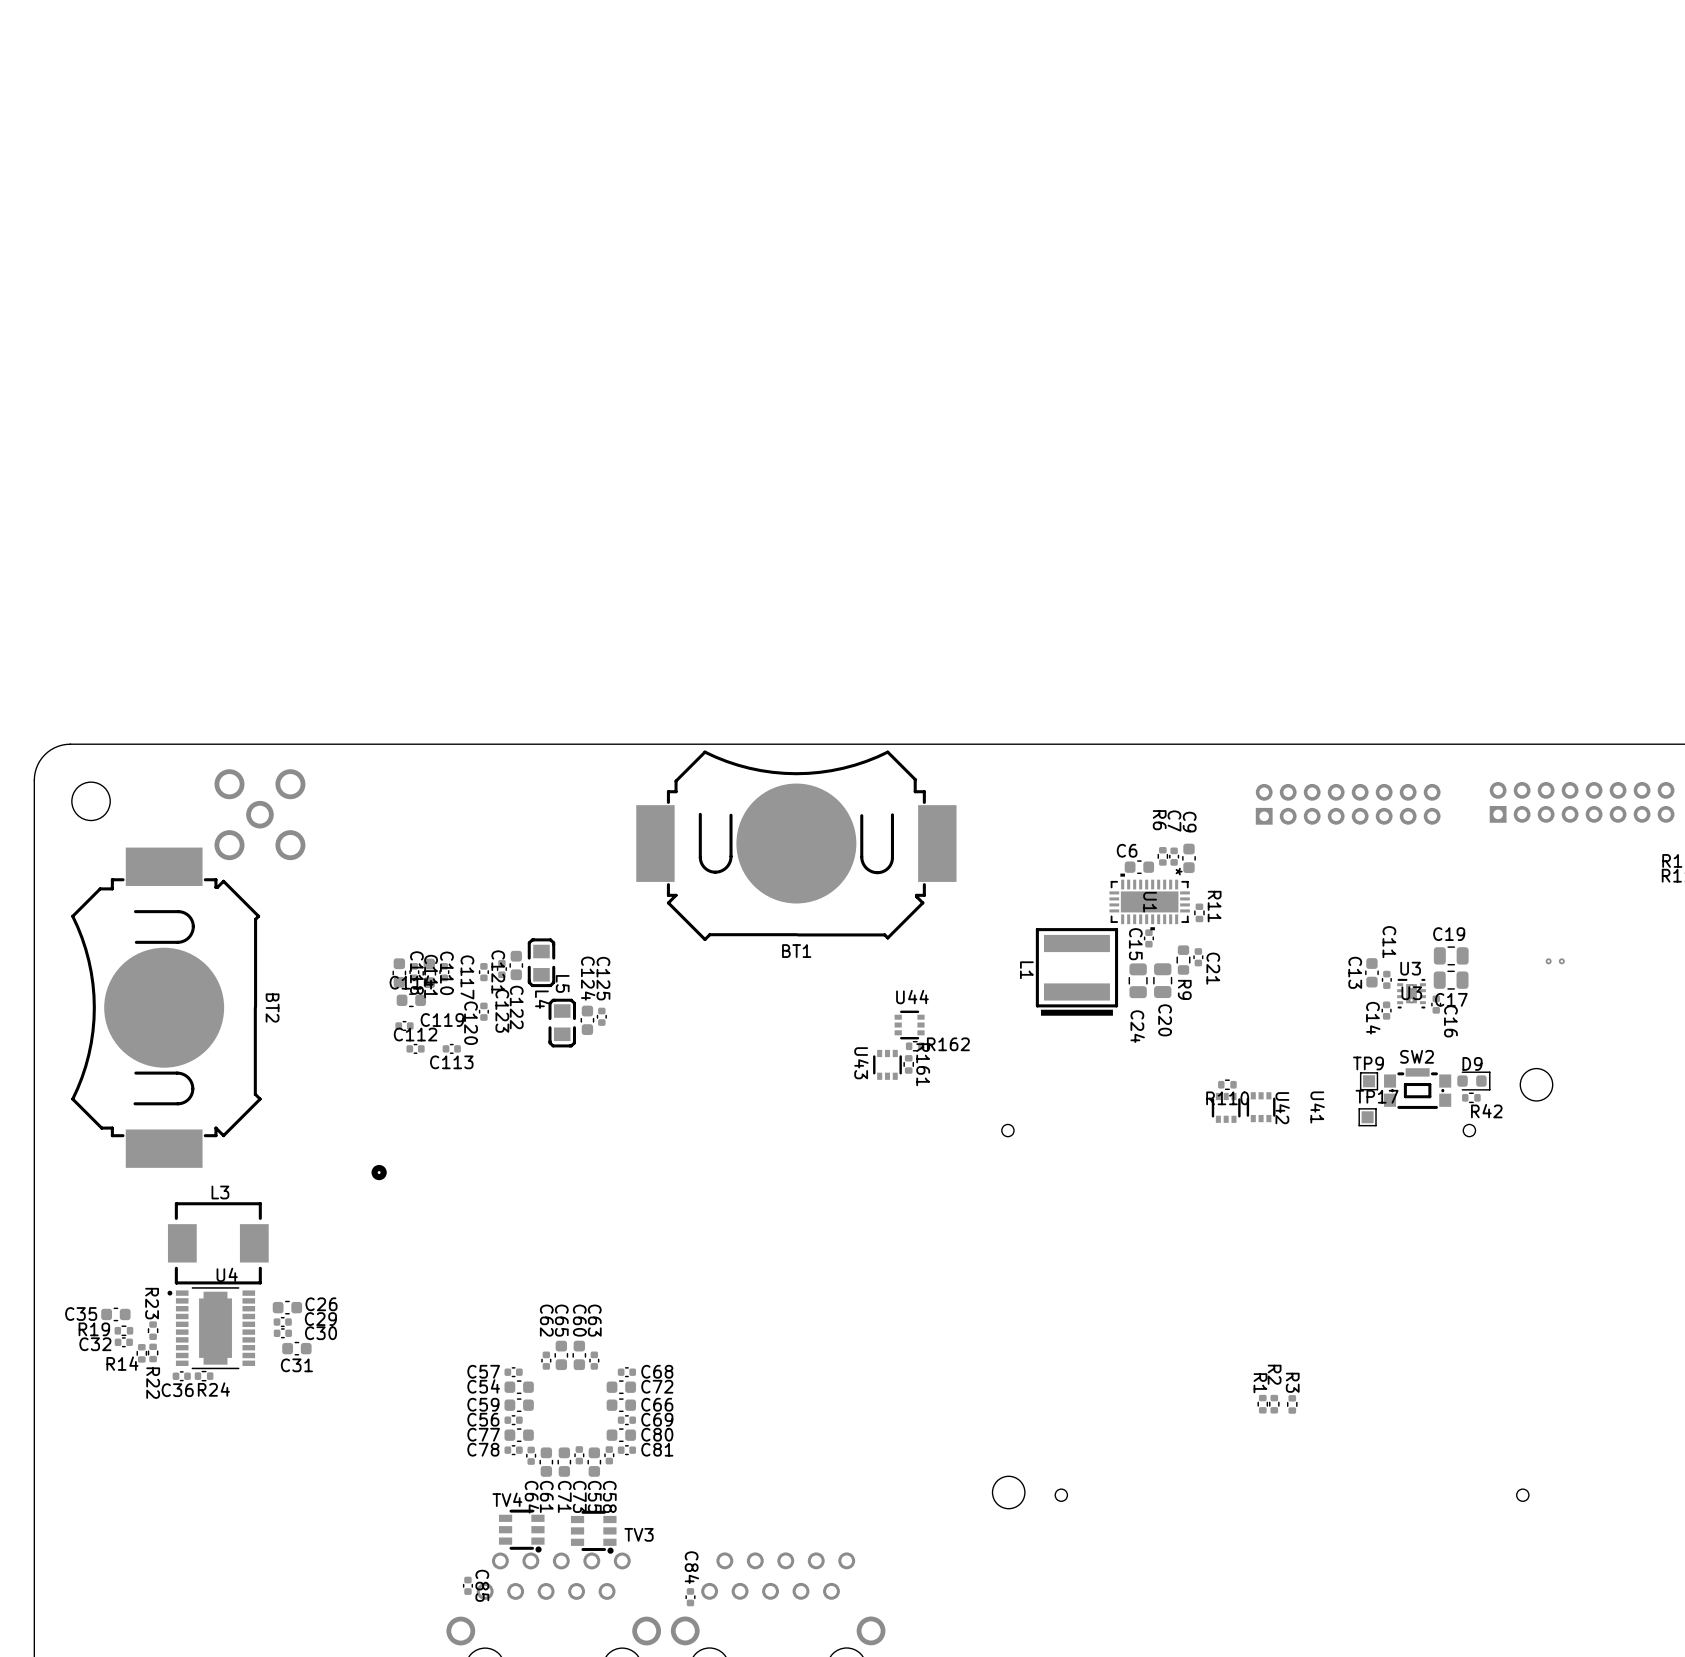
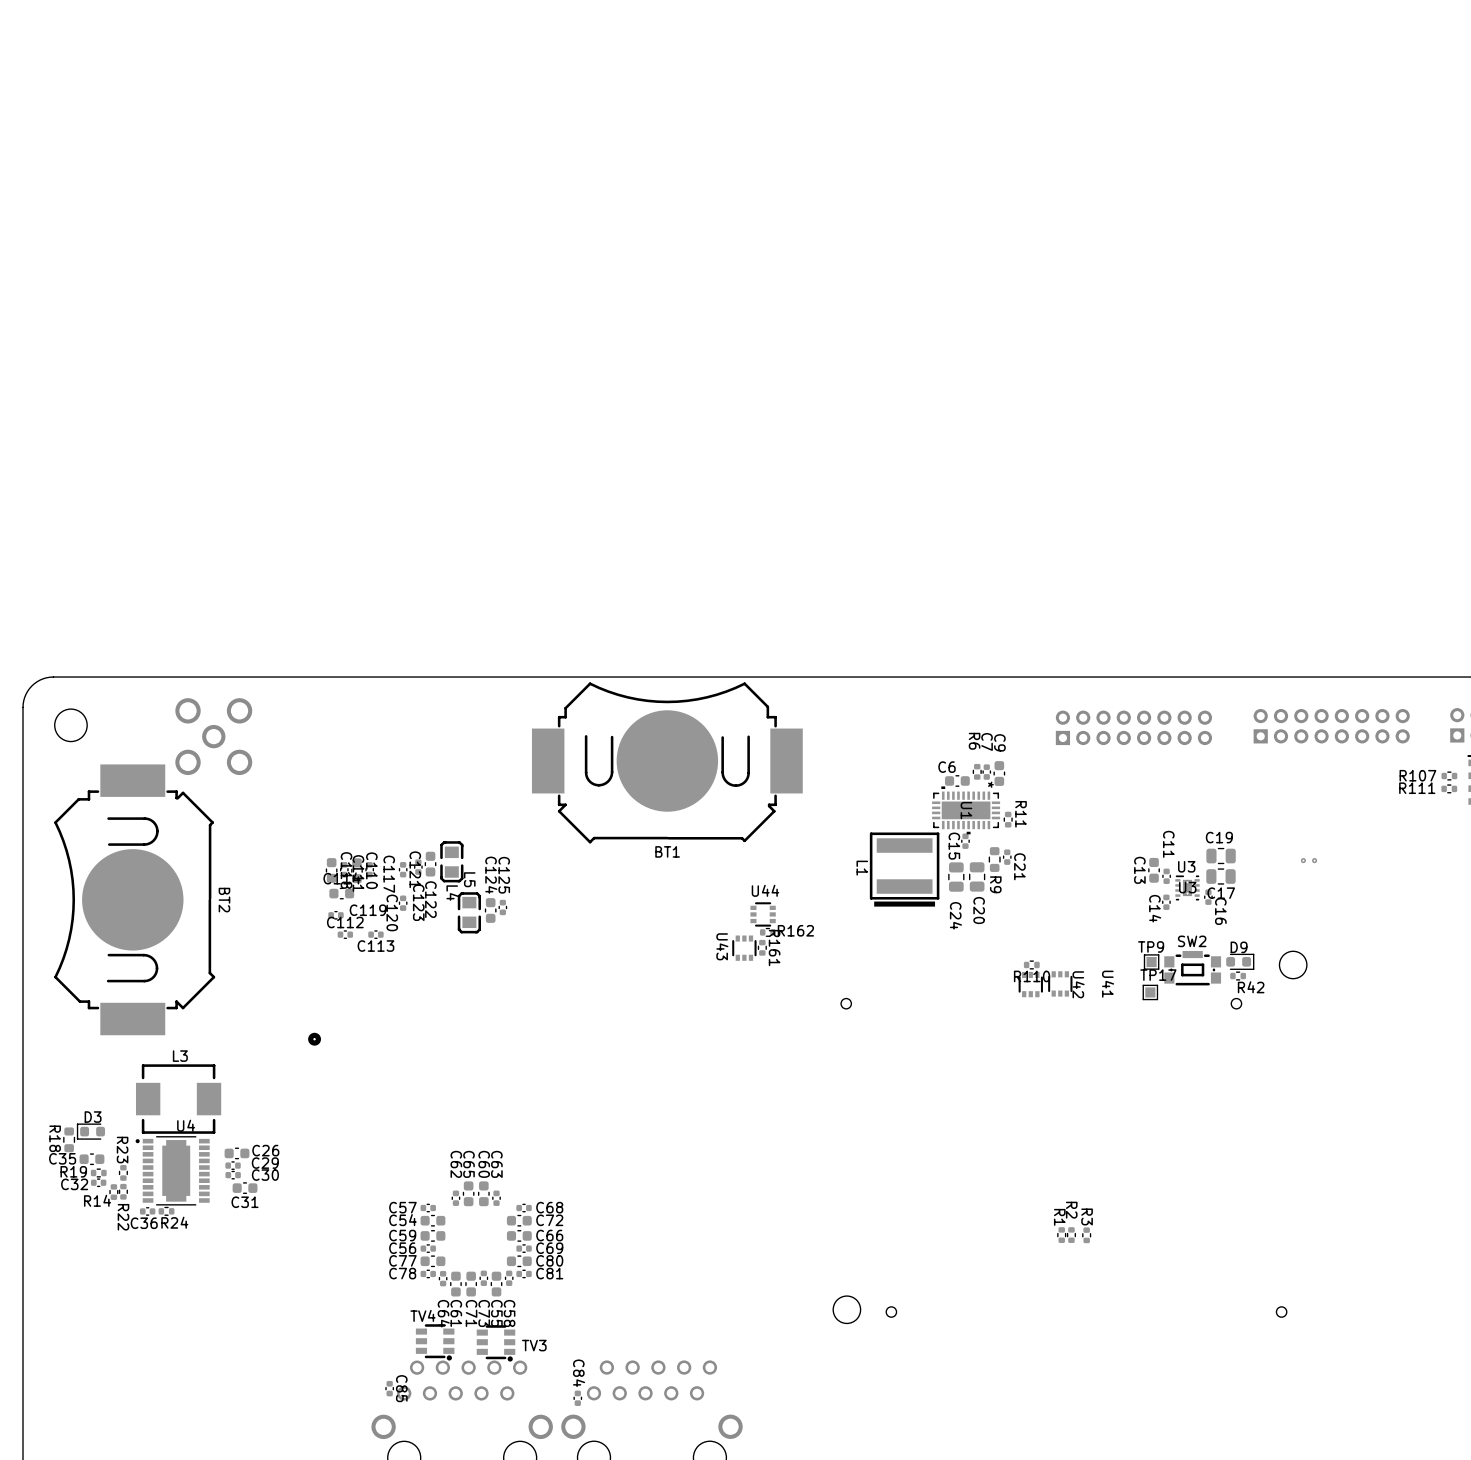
D3: none -> (90, 1131)
R18: none -> (69, 1139)

